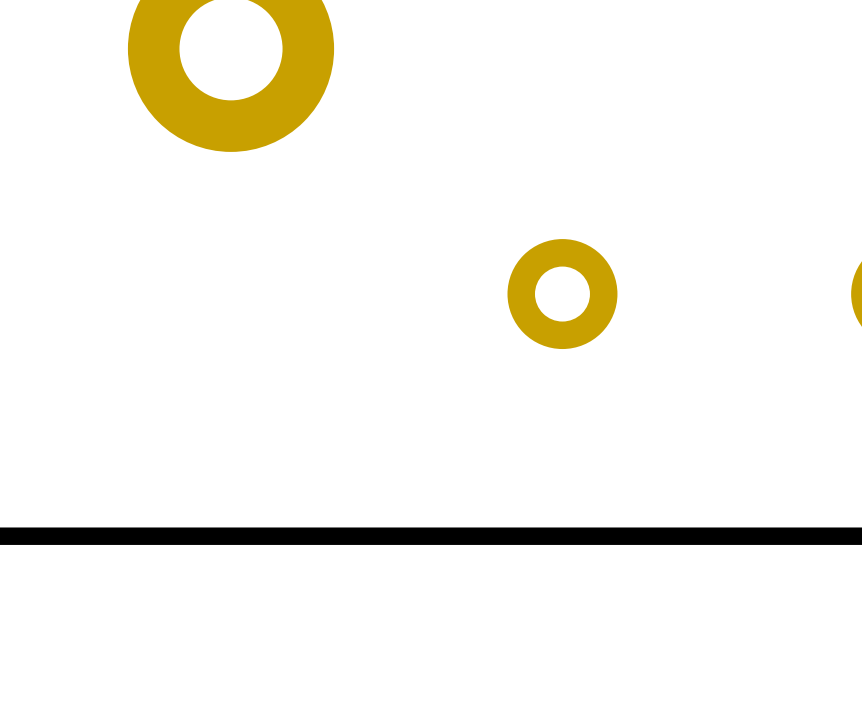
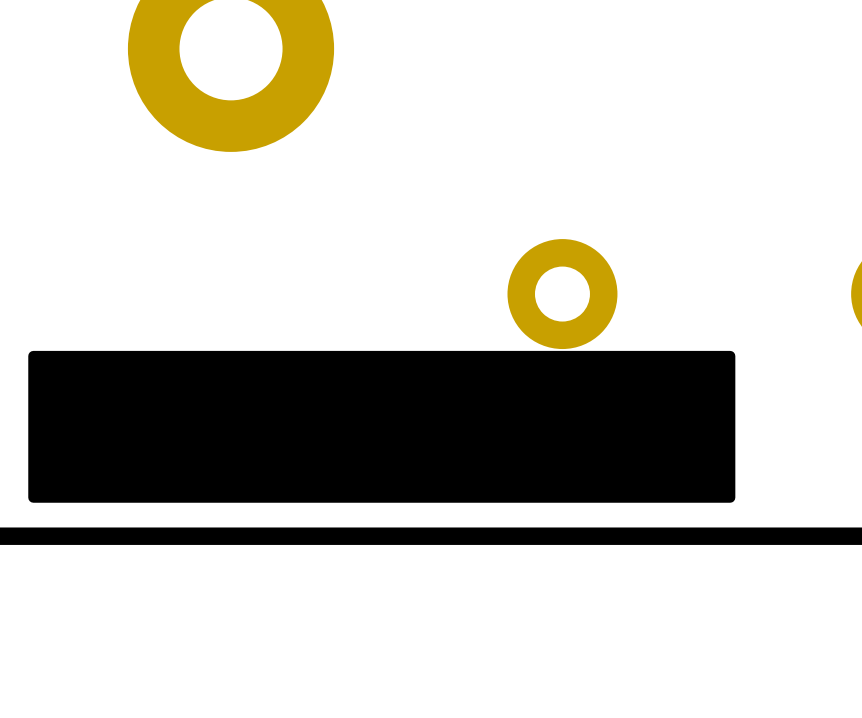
drawing: none -> [28, 350, 736, 503]

